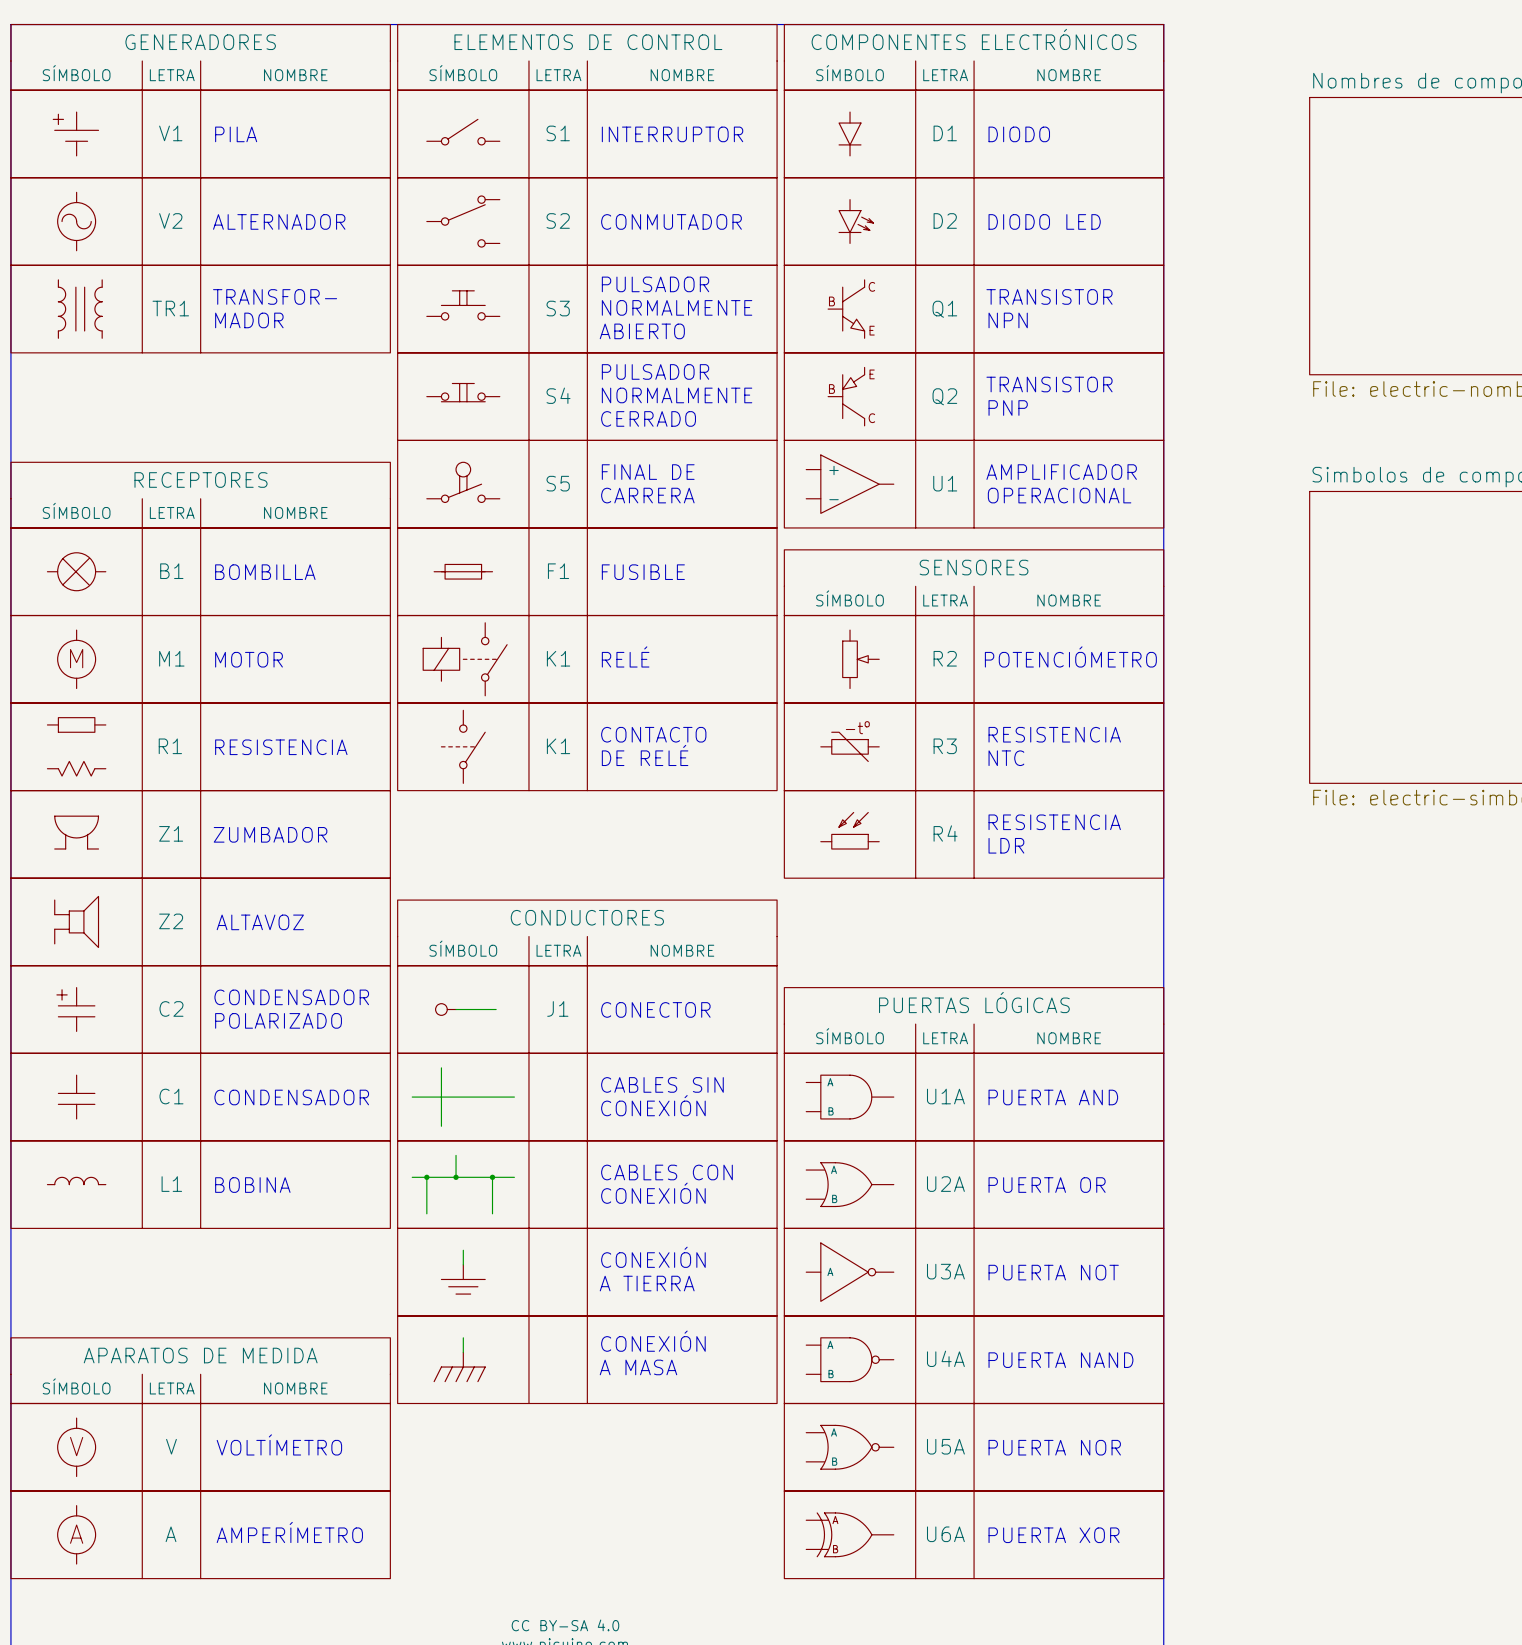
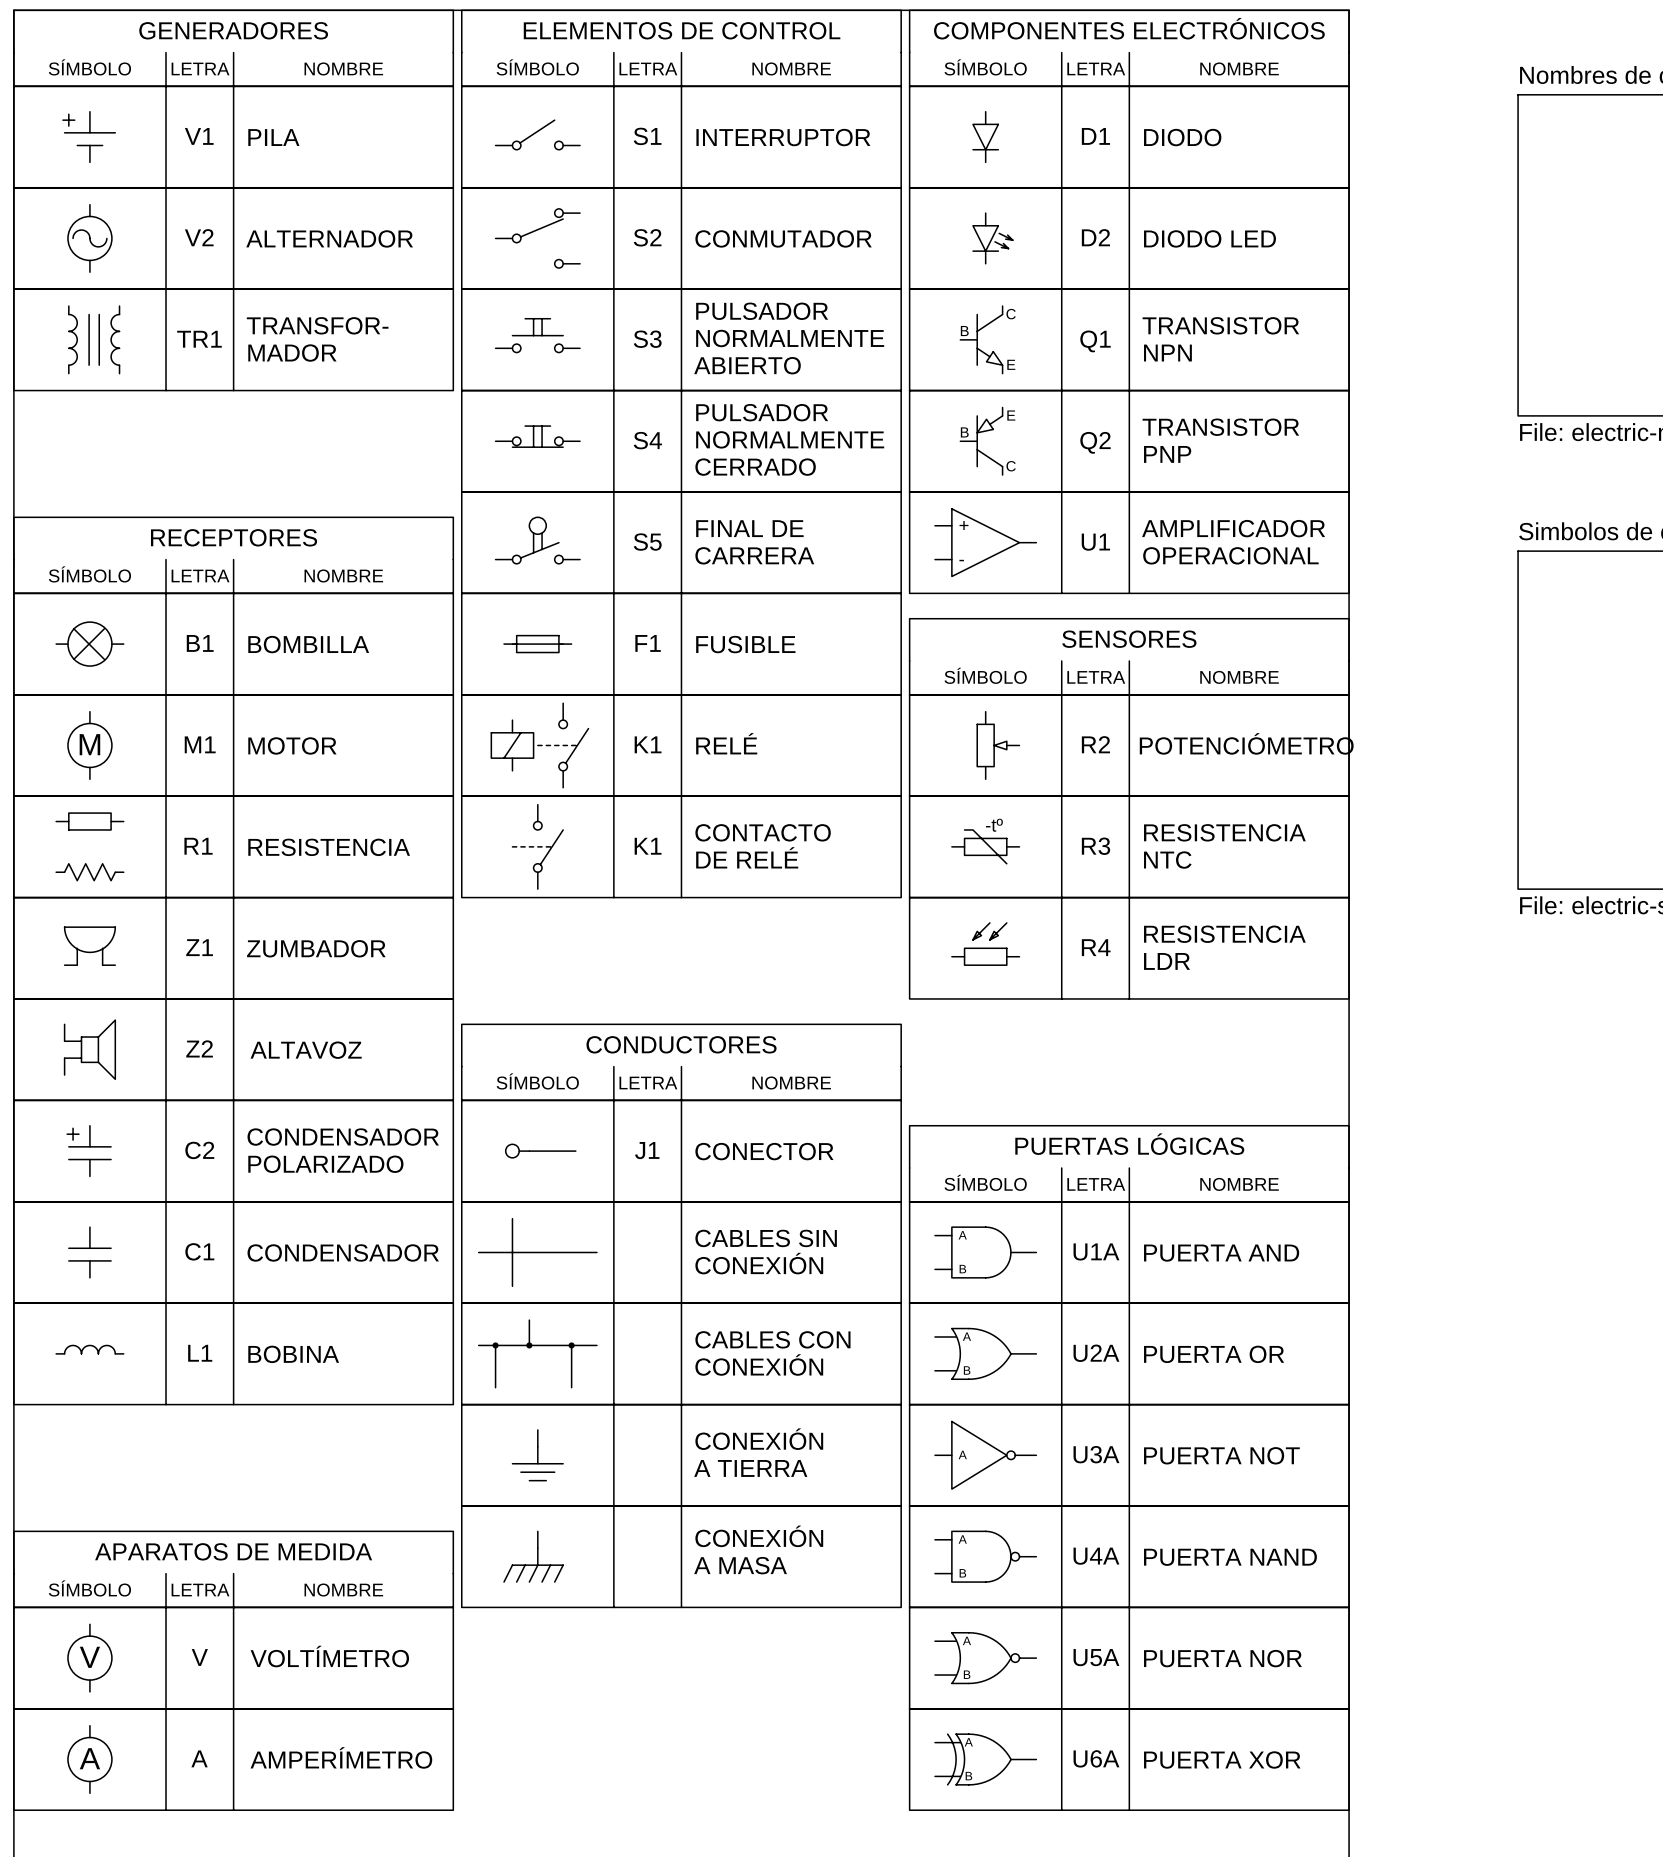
R1: (76, 768) -> none
part: none -> (89, 872)

